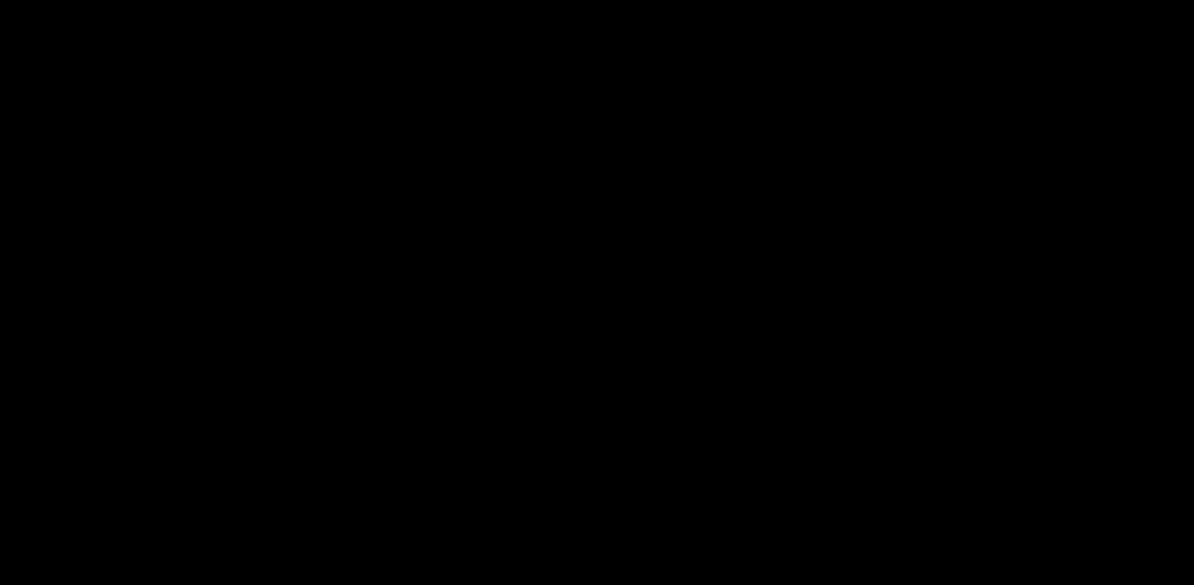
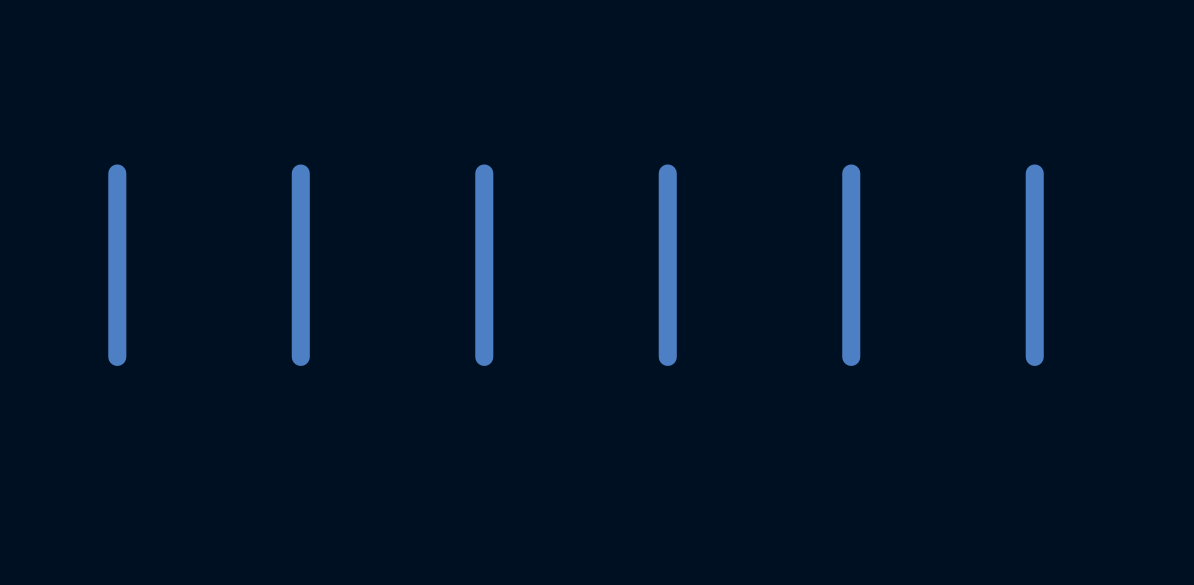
bottom track: none -> (117, 173) (117, 356)
bottom track: none -> (300, 173) (300, 356)
bottom track: none -> (484, 173) (484, 356)
bottom track: none -> (667, 173) (667, 356)
bottom track: none -> (851, 173) (851, 356)
bottom track: none -> (1034, 173) (1034, 356)

